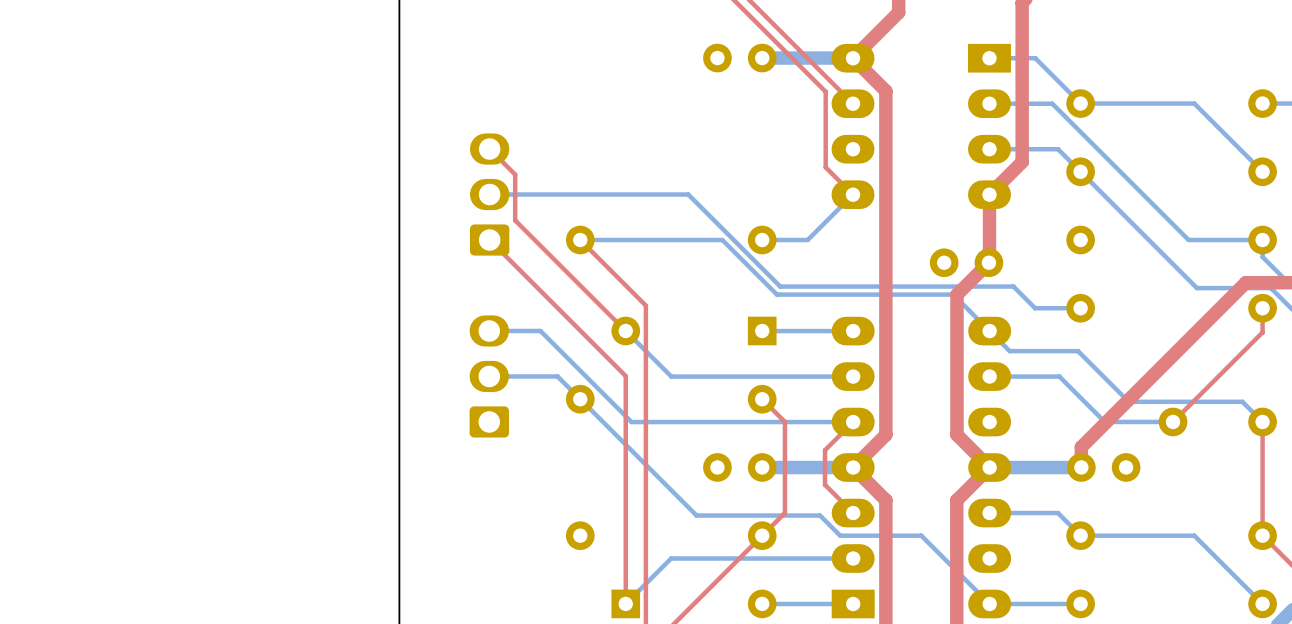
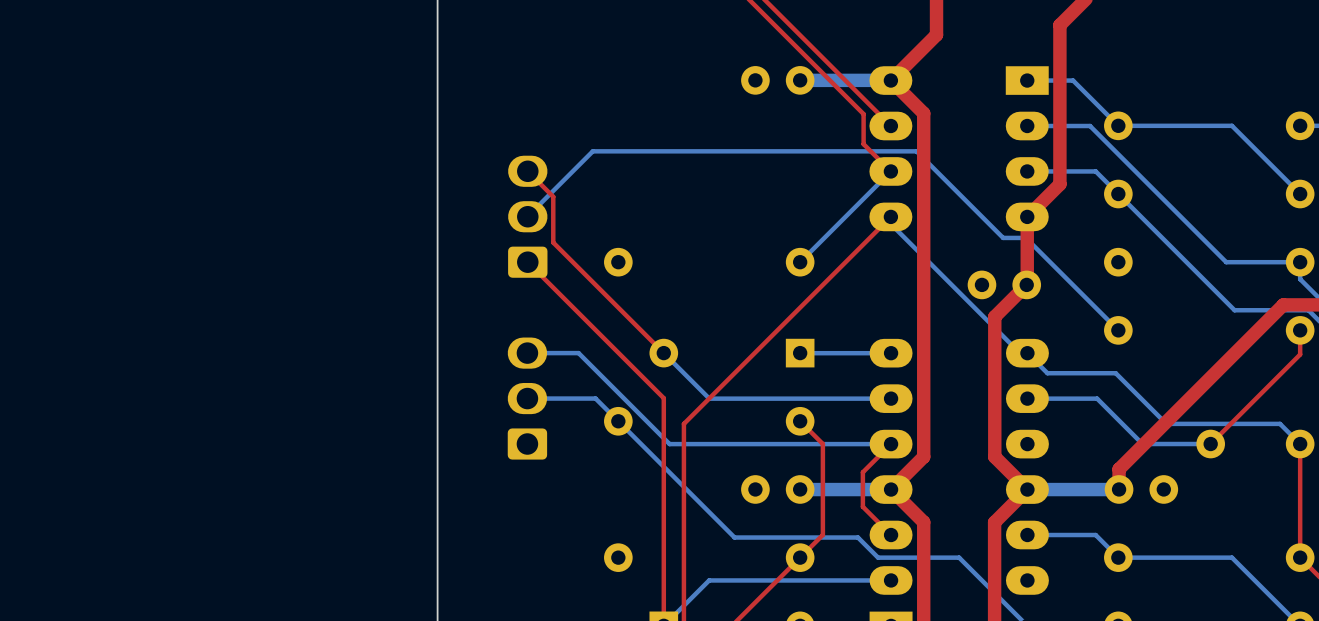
top track: (825, 121) (825, 167) (853, 194) -> (863, 144) (890, 171)
bottom track: (489, 194) (688, 194) (780, 286) (1013, 286) (1035, 308) (1080, 308) -> (527, 216) (592, 151) (916, 151) (1003, 237) (1025, 237) (1118, 330)
bottom track: (853, 194) (807, 240) (762, 240) -> (890, 171) (800, 262)
top track: (580, 240) (645, 305) (645, 401) -> (890, 216) (683, 423)
bottom track: (580, 240) (722, 240) (776, 294) (953, 294) (989, 331) -> (890, 216) (890, 224) (1019, 353) (1027, 353)

